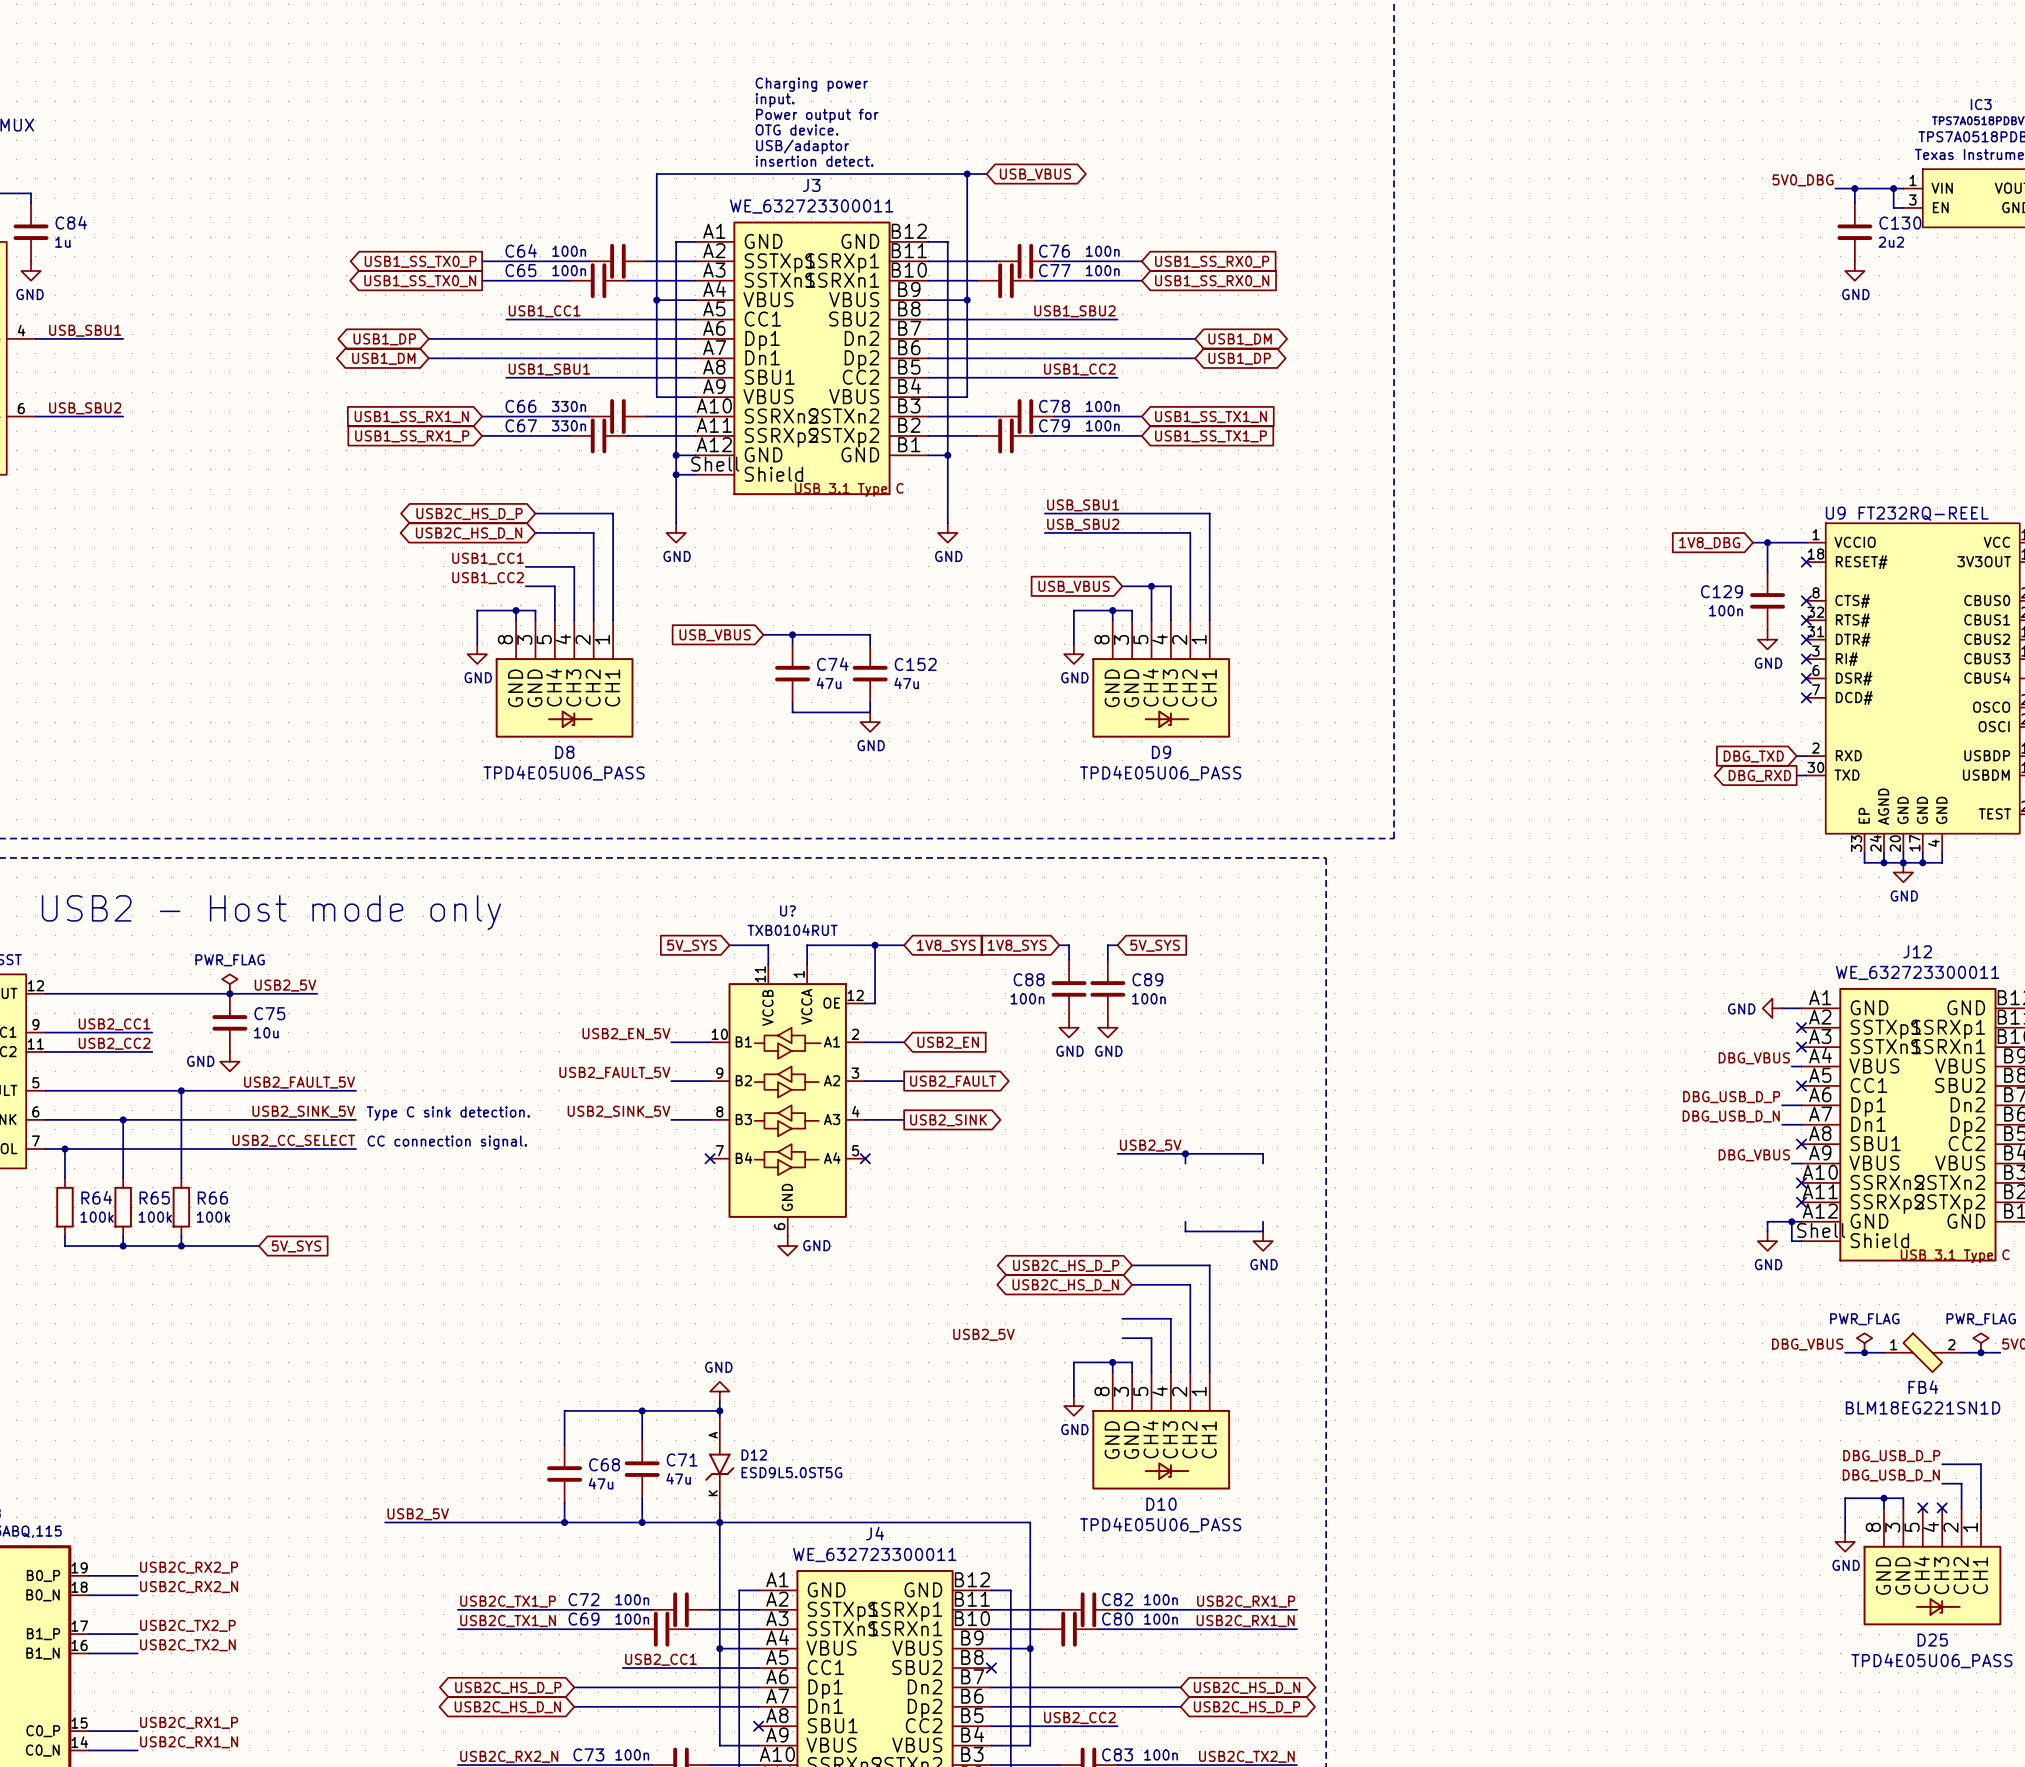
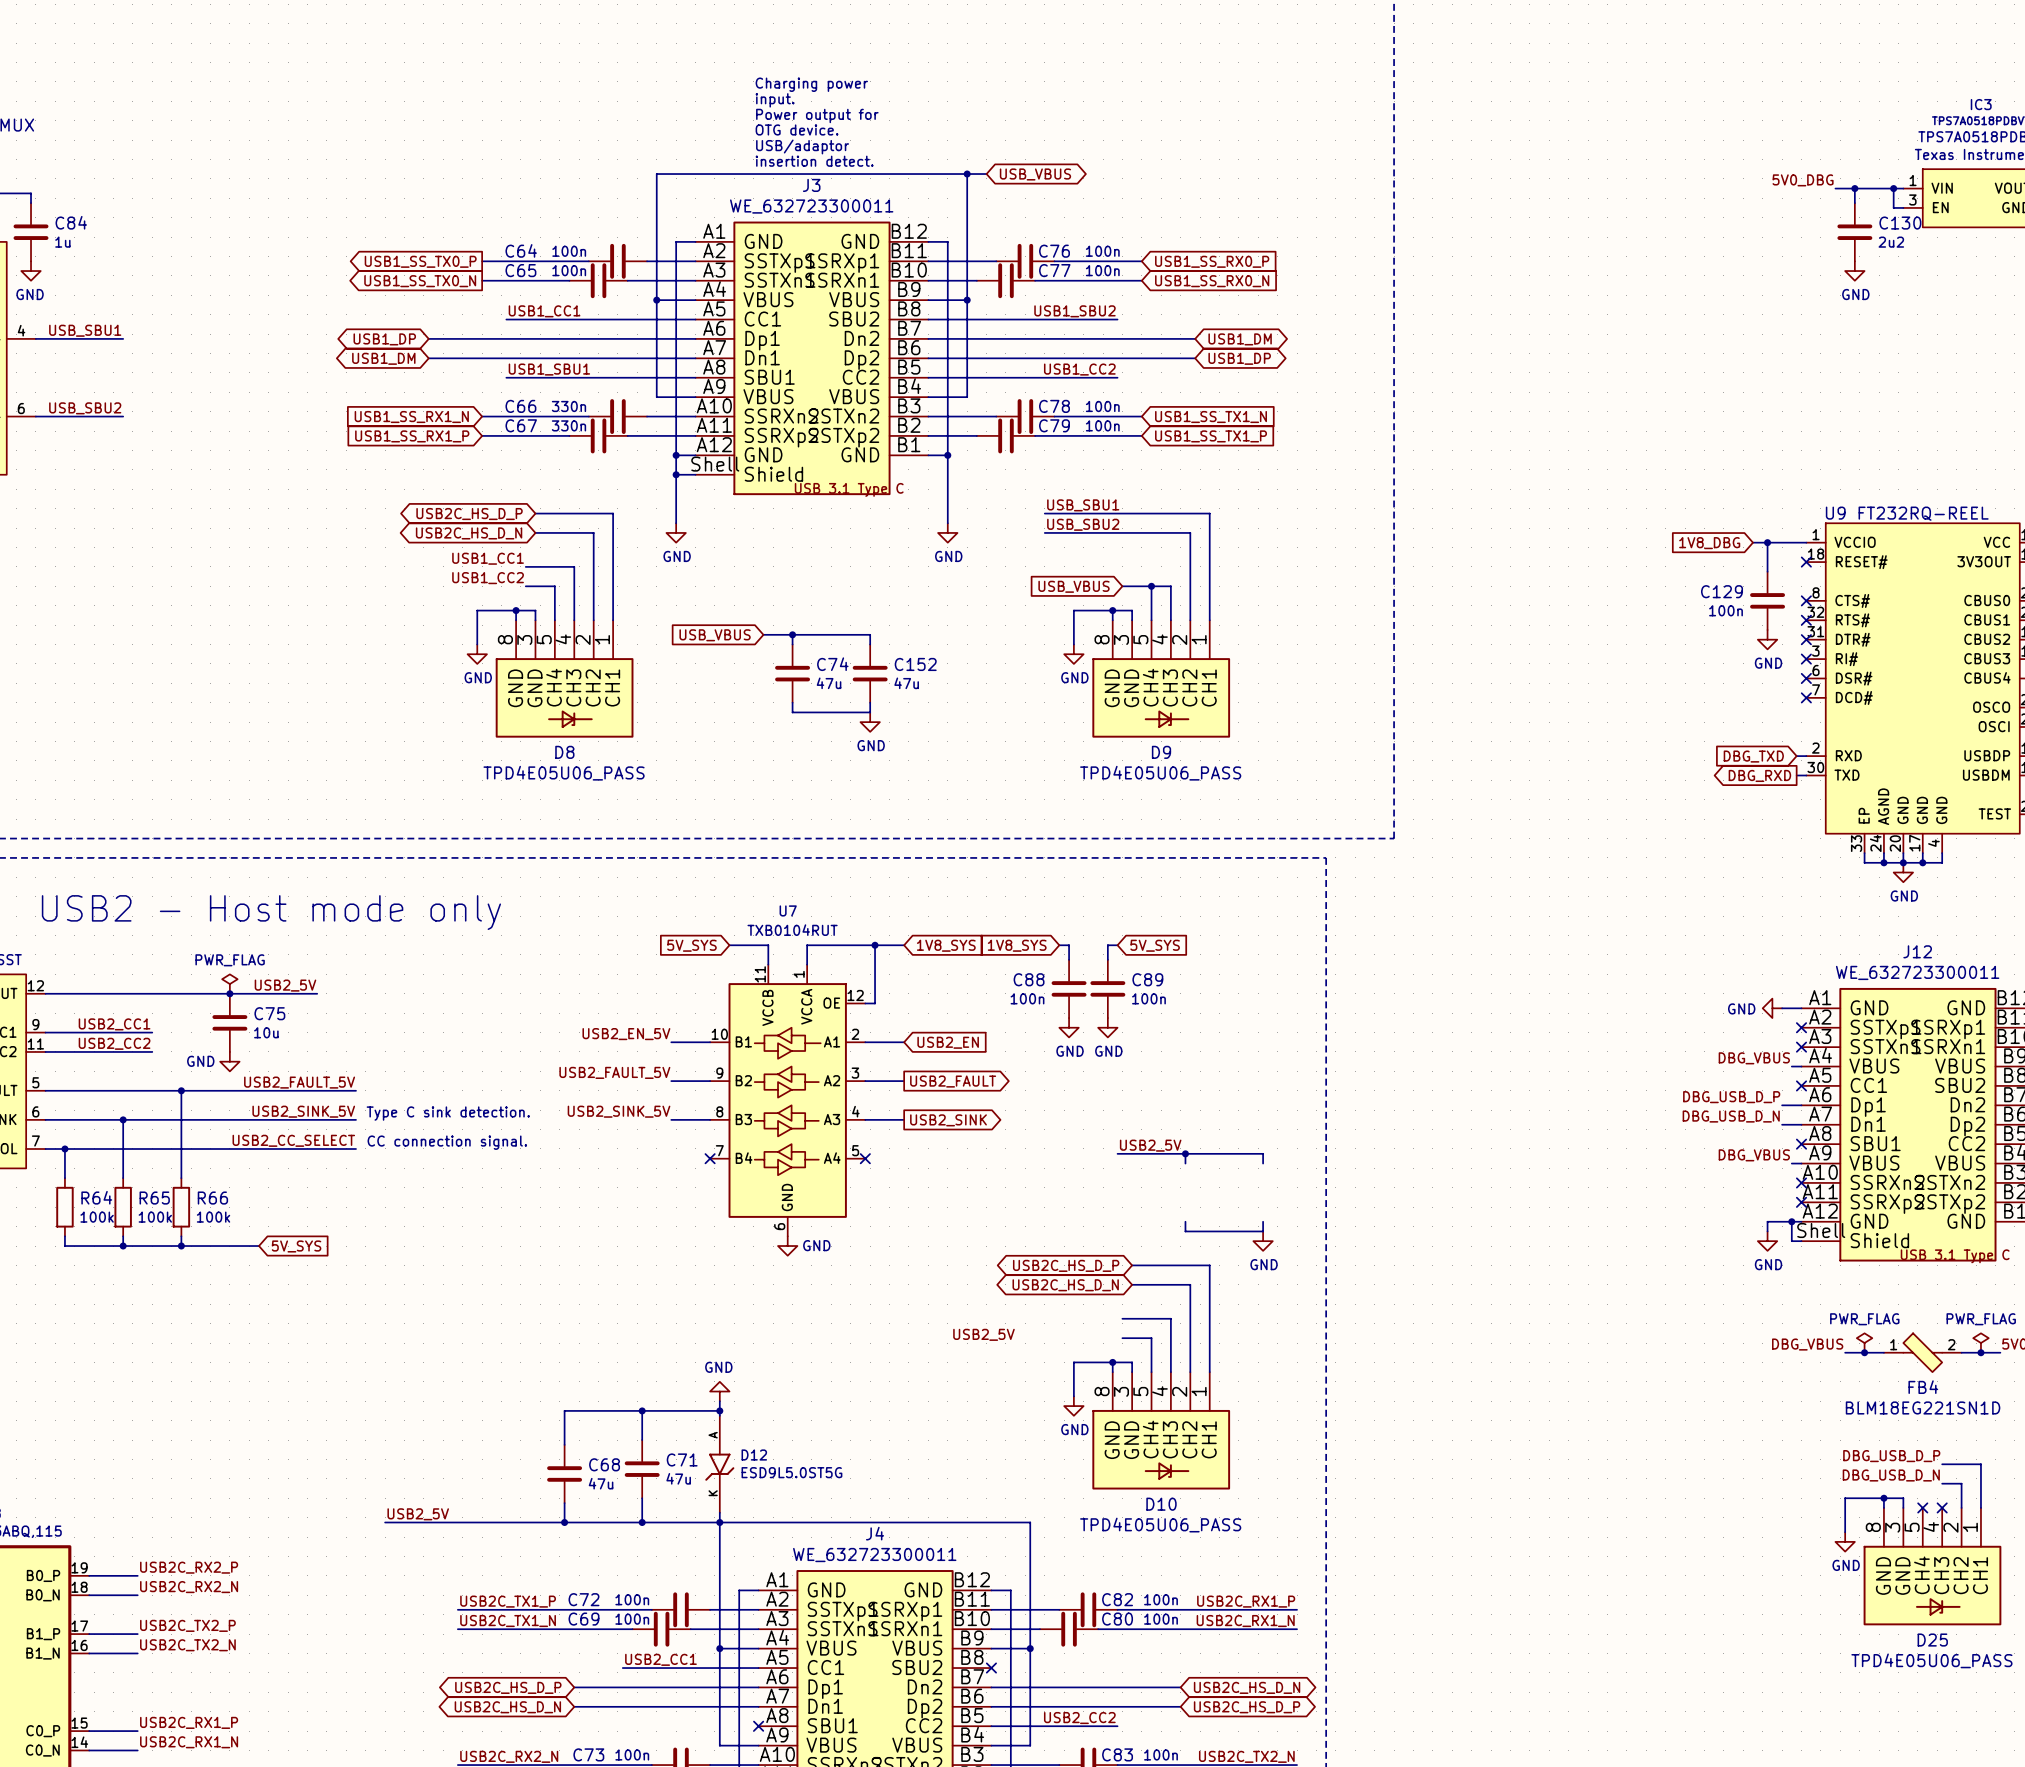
U? name: U? (787, 910) -> U7 (788, 910)

